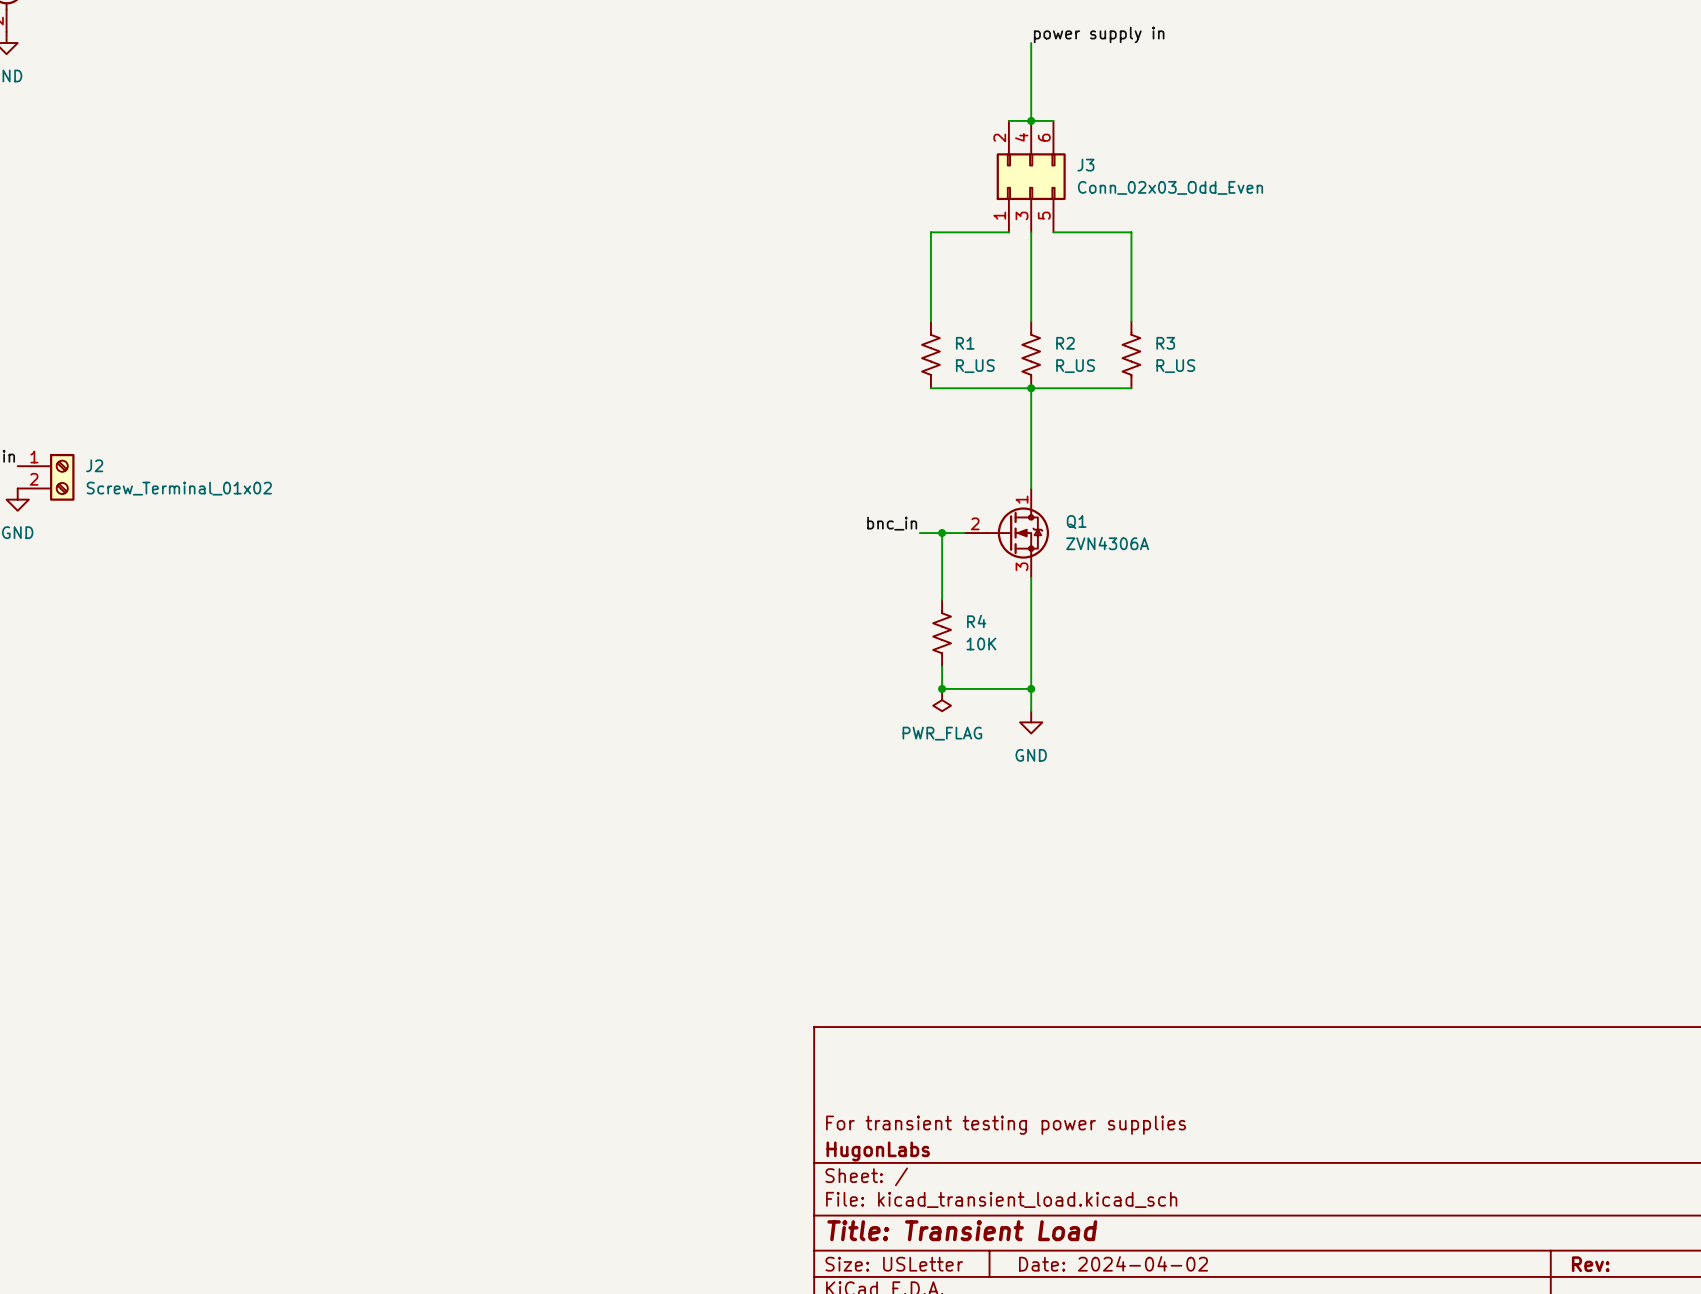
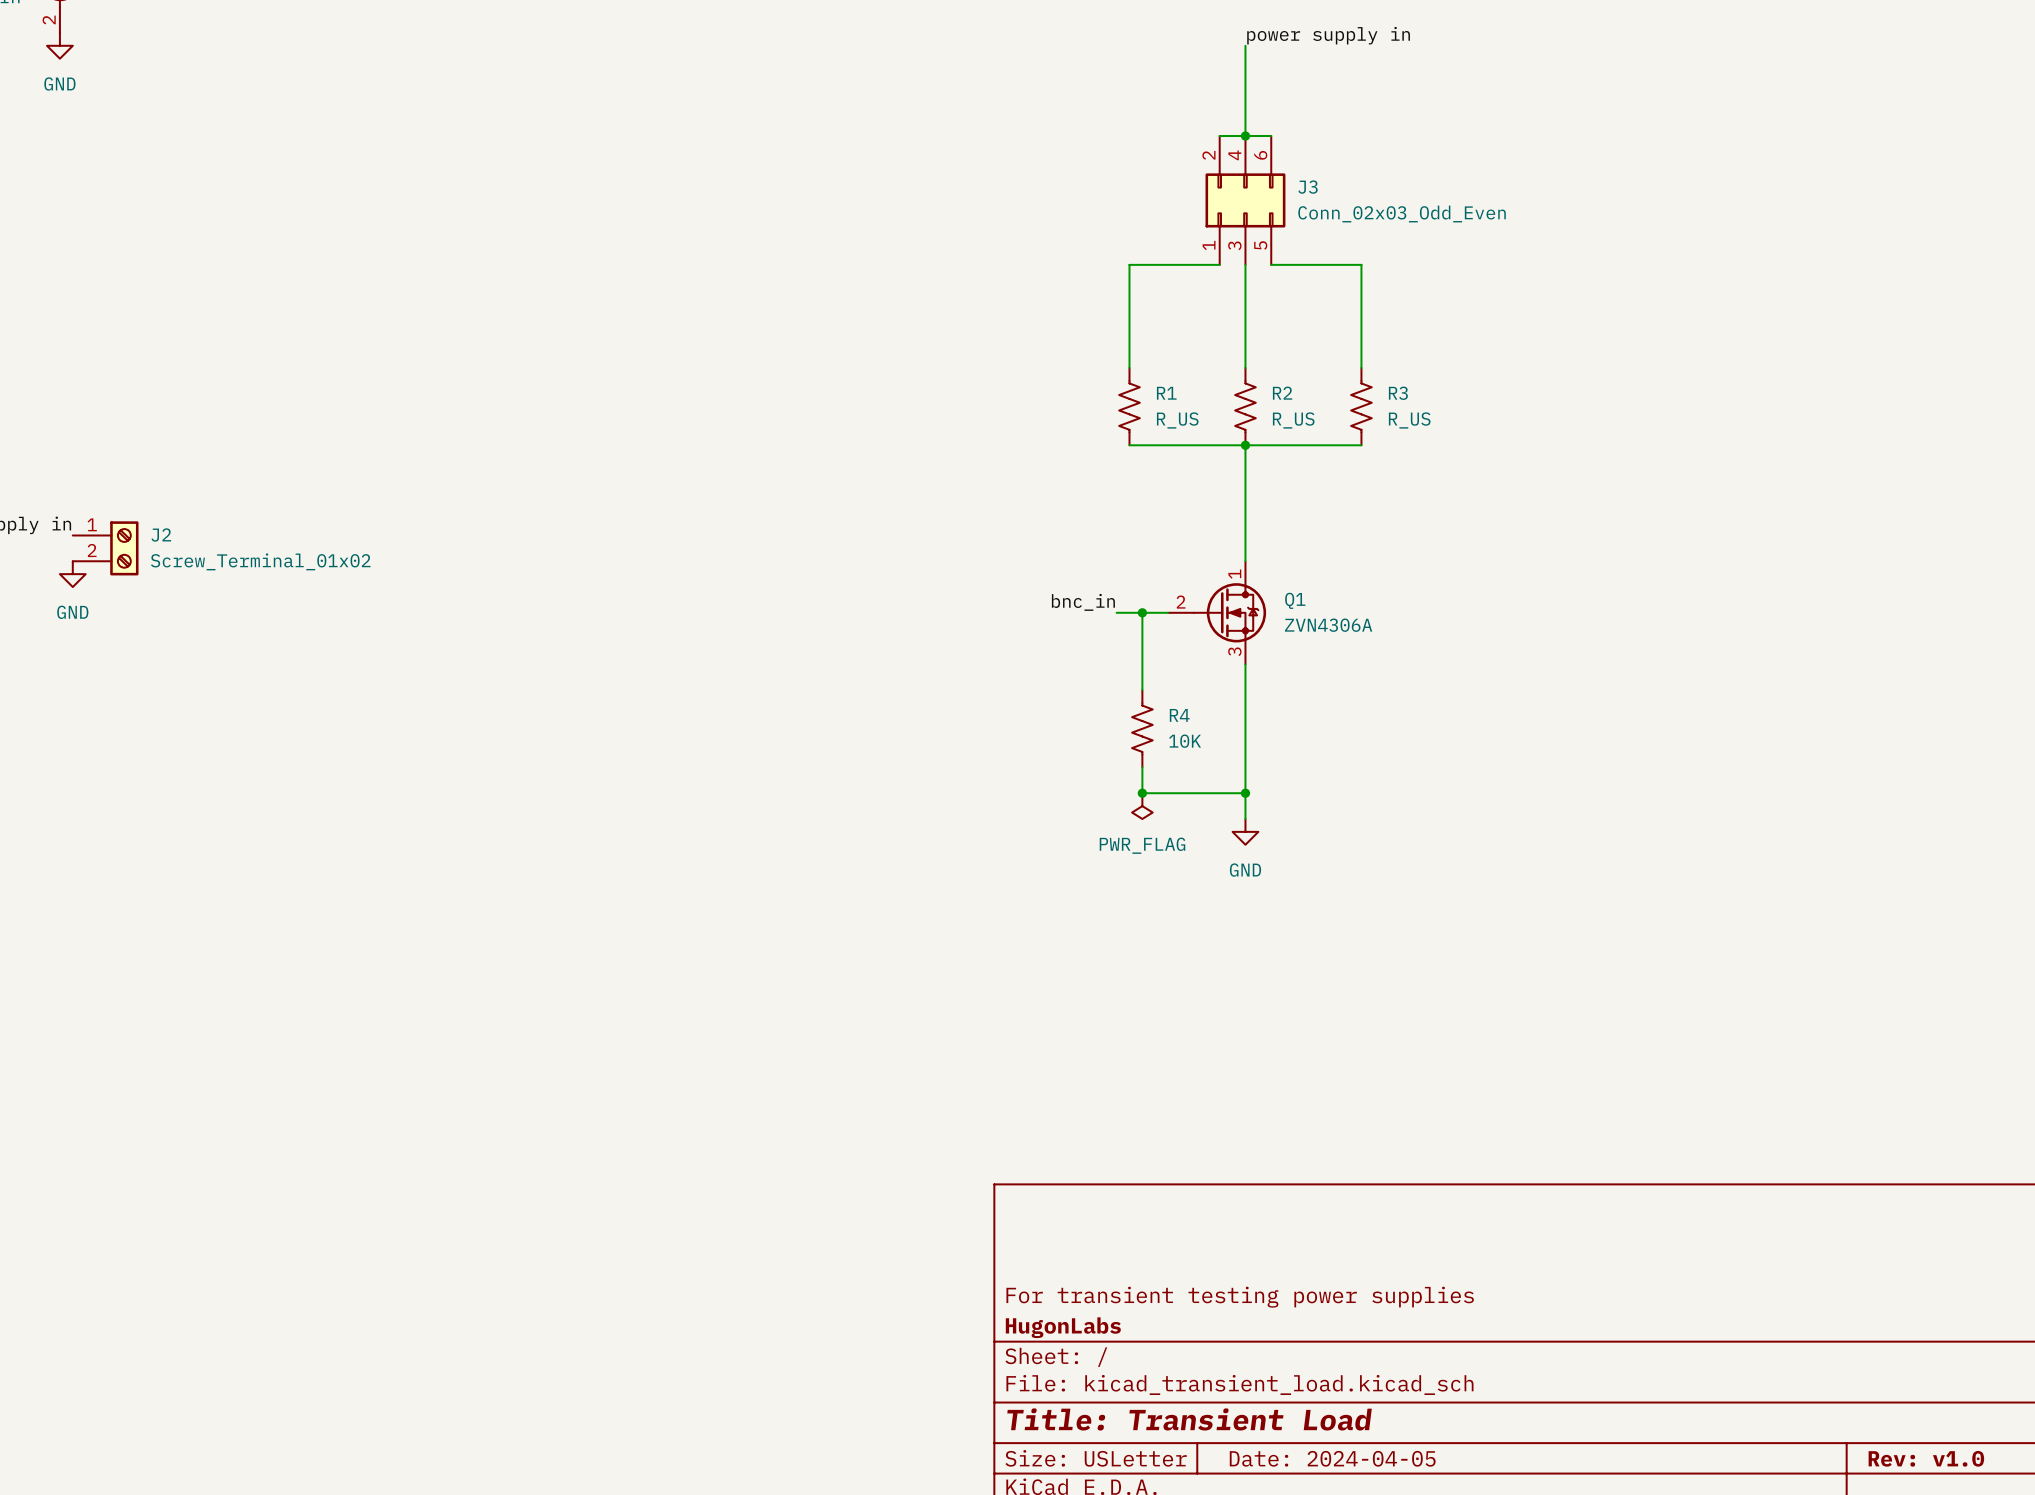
title block: Date: 2024-04-02 (1113, 1263) -> Date: 2024-04-05 (1332, 1458)
title block: Rev: (1590, 1264) -> Rev: v1.0 (1926, 1458)

